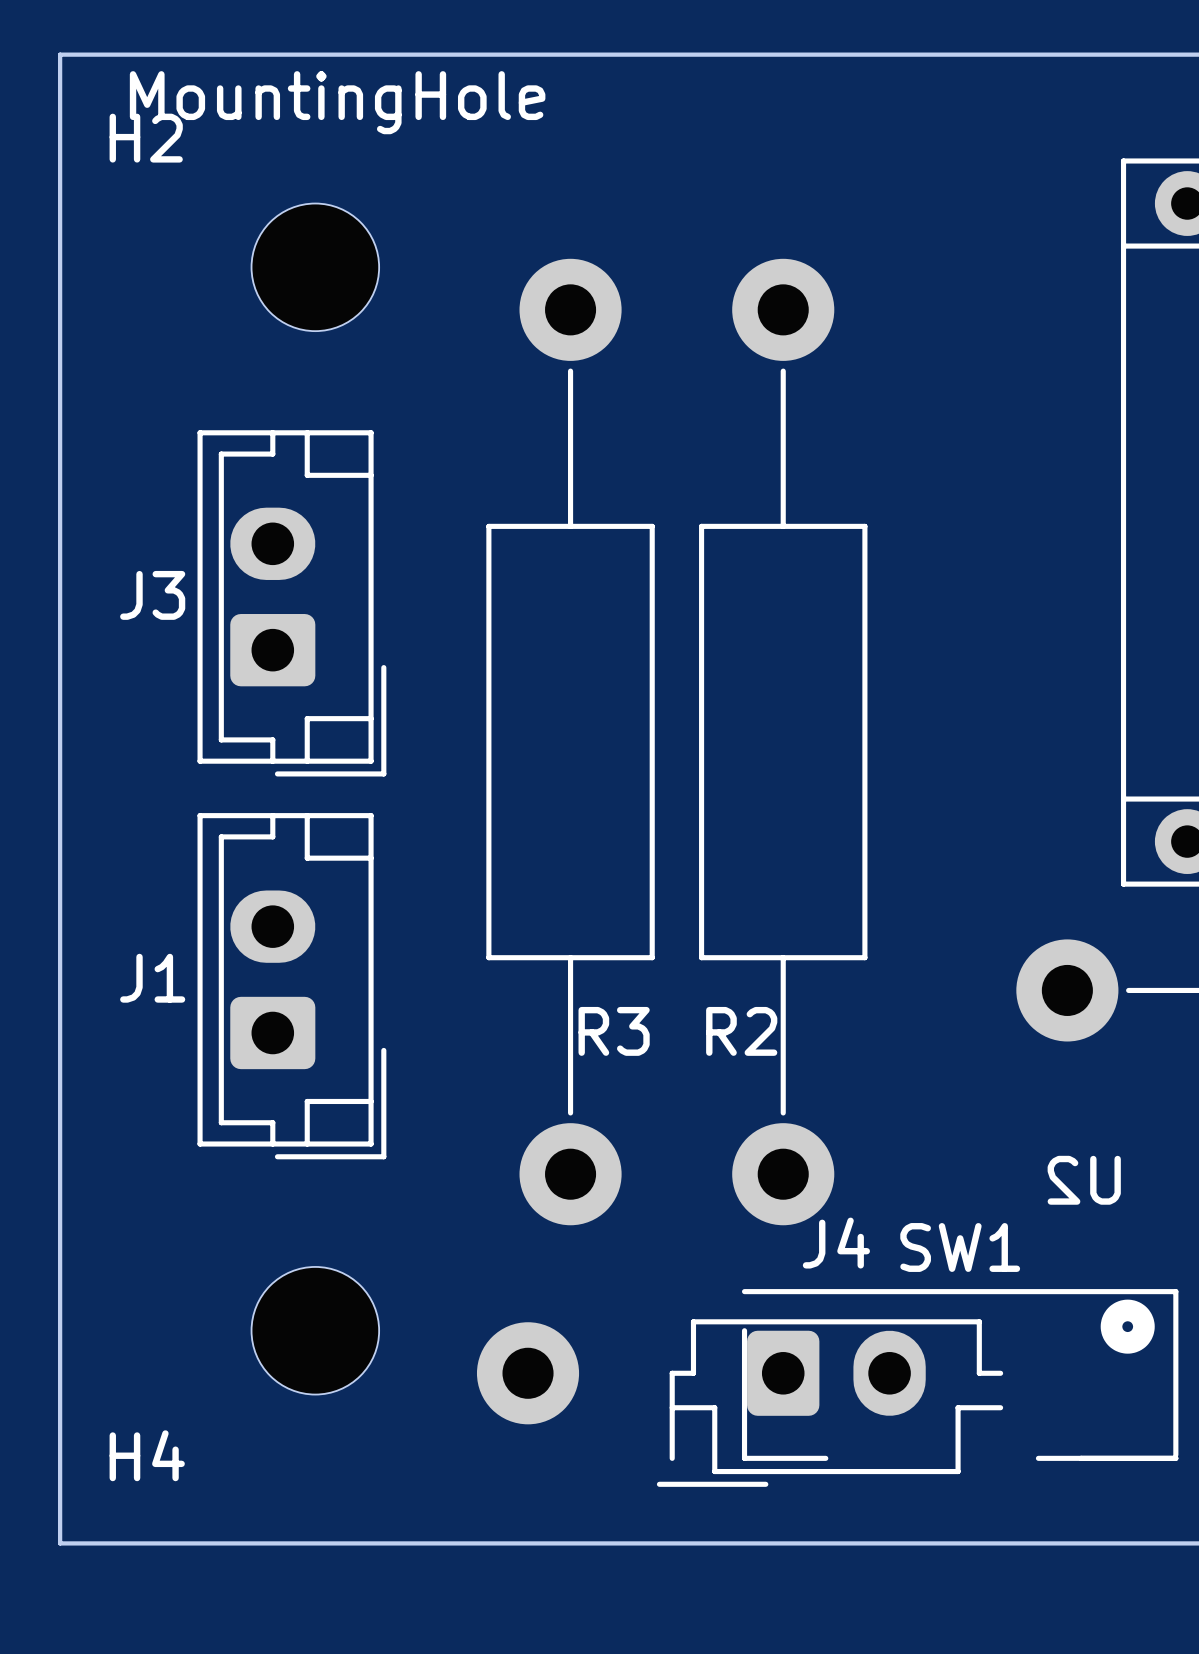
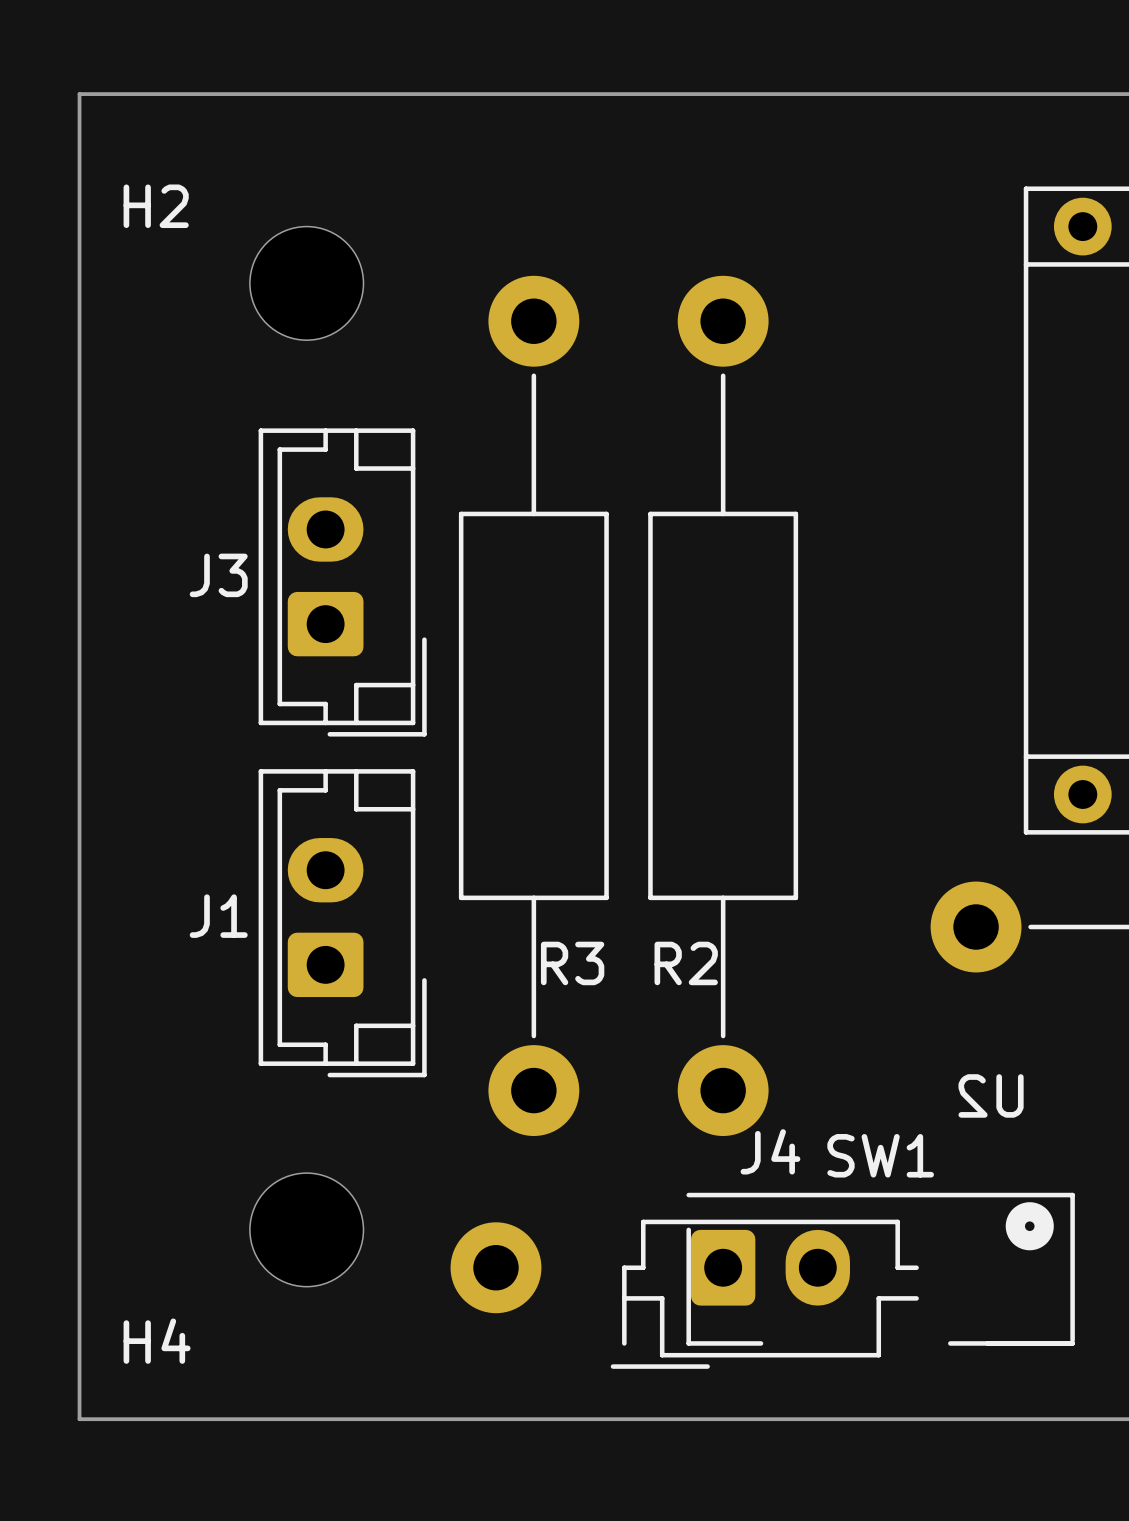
H2 value: MountingHole (337, 102) -> none
H2 name position: H2 (146, 138) -> H2 (156, 206)
J3 position: (291, 603) -> (342, 582)
J1 position: (291, 986) -> (342, 923)

